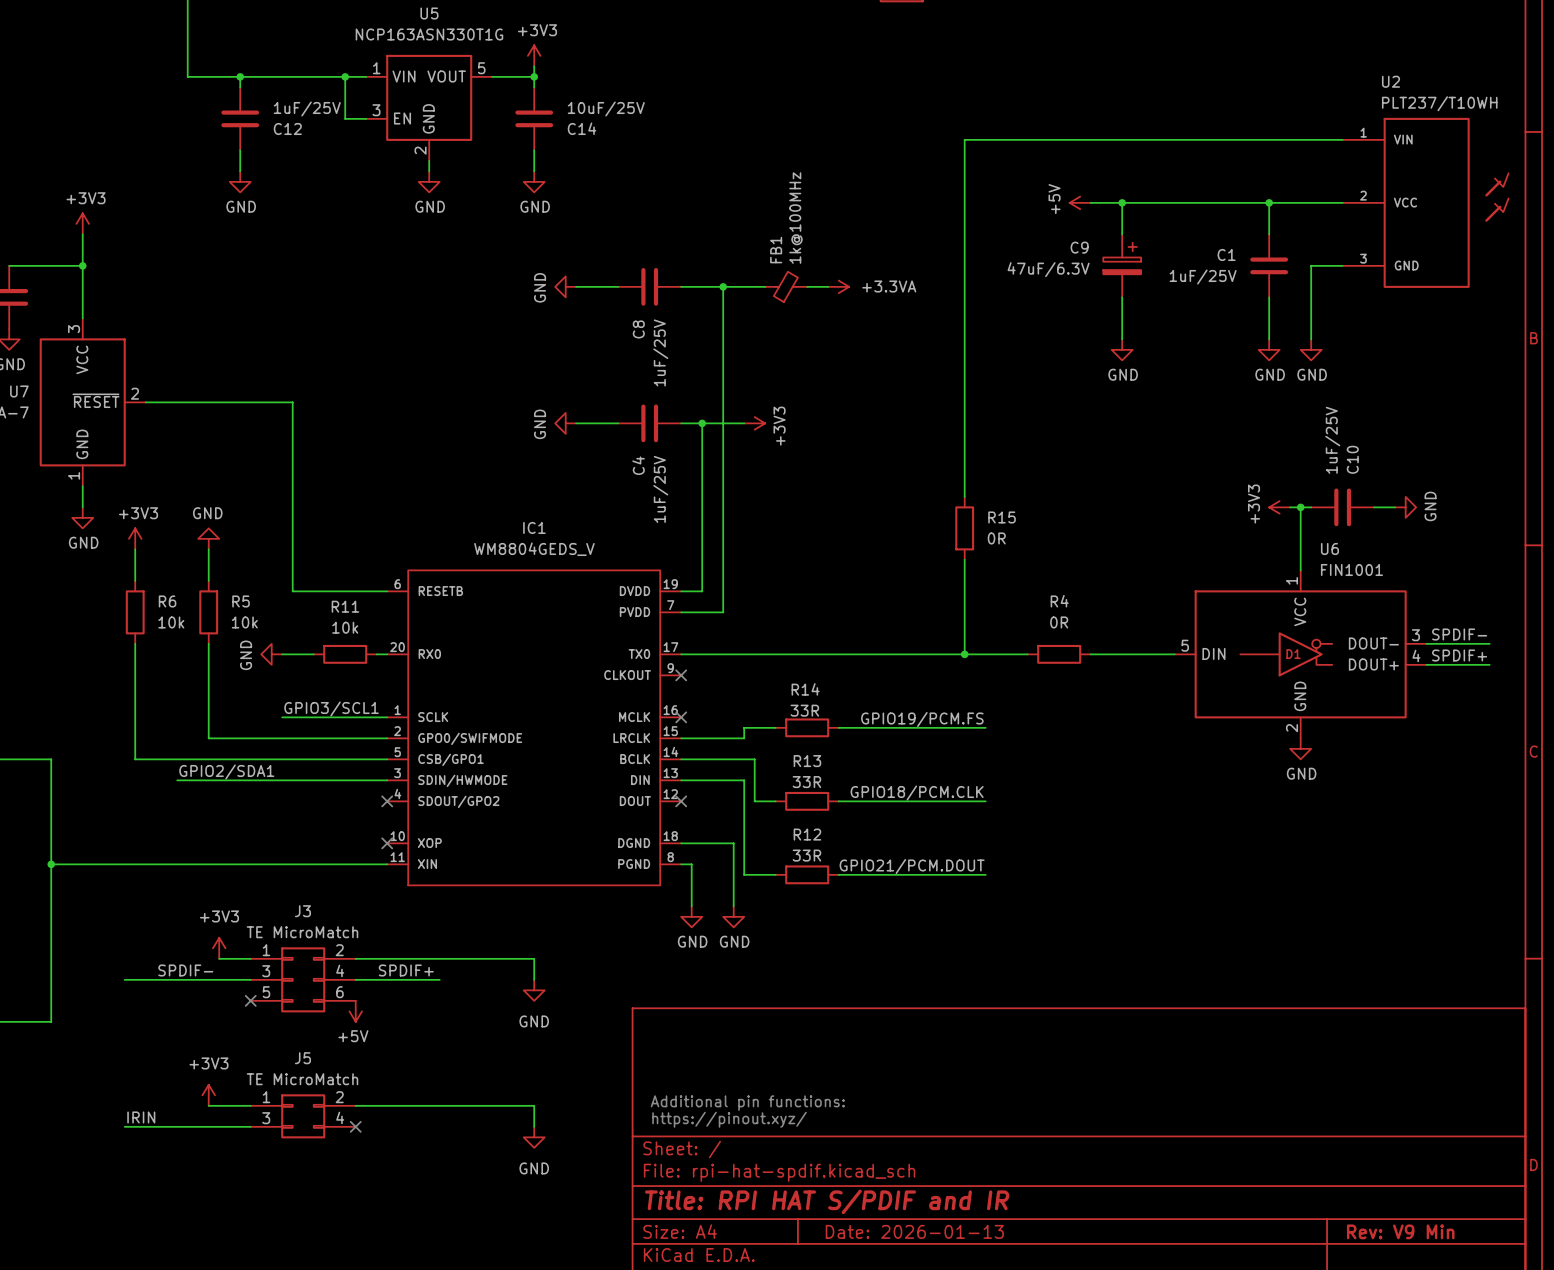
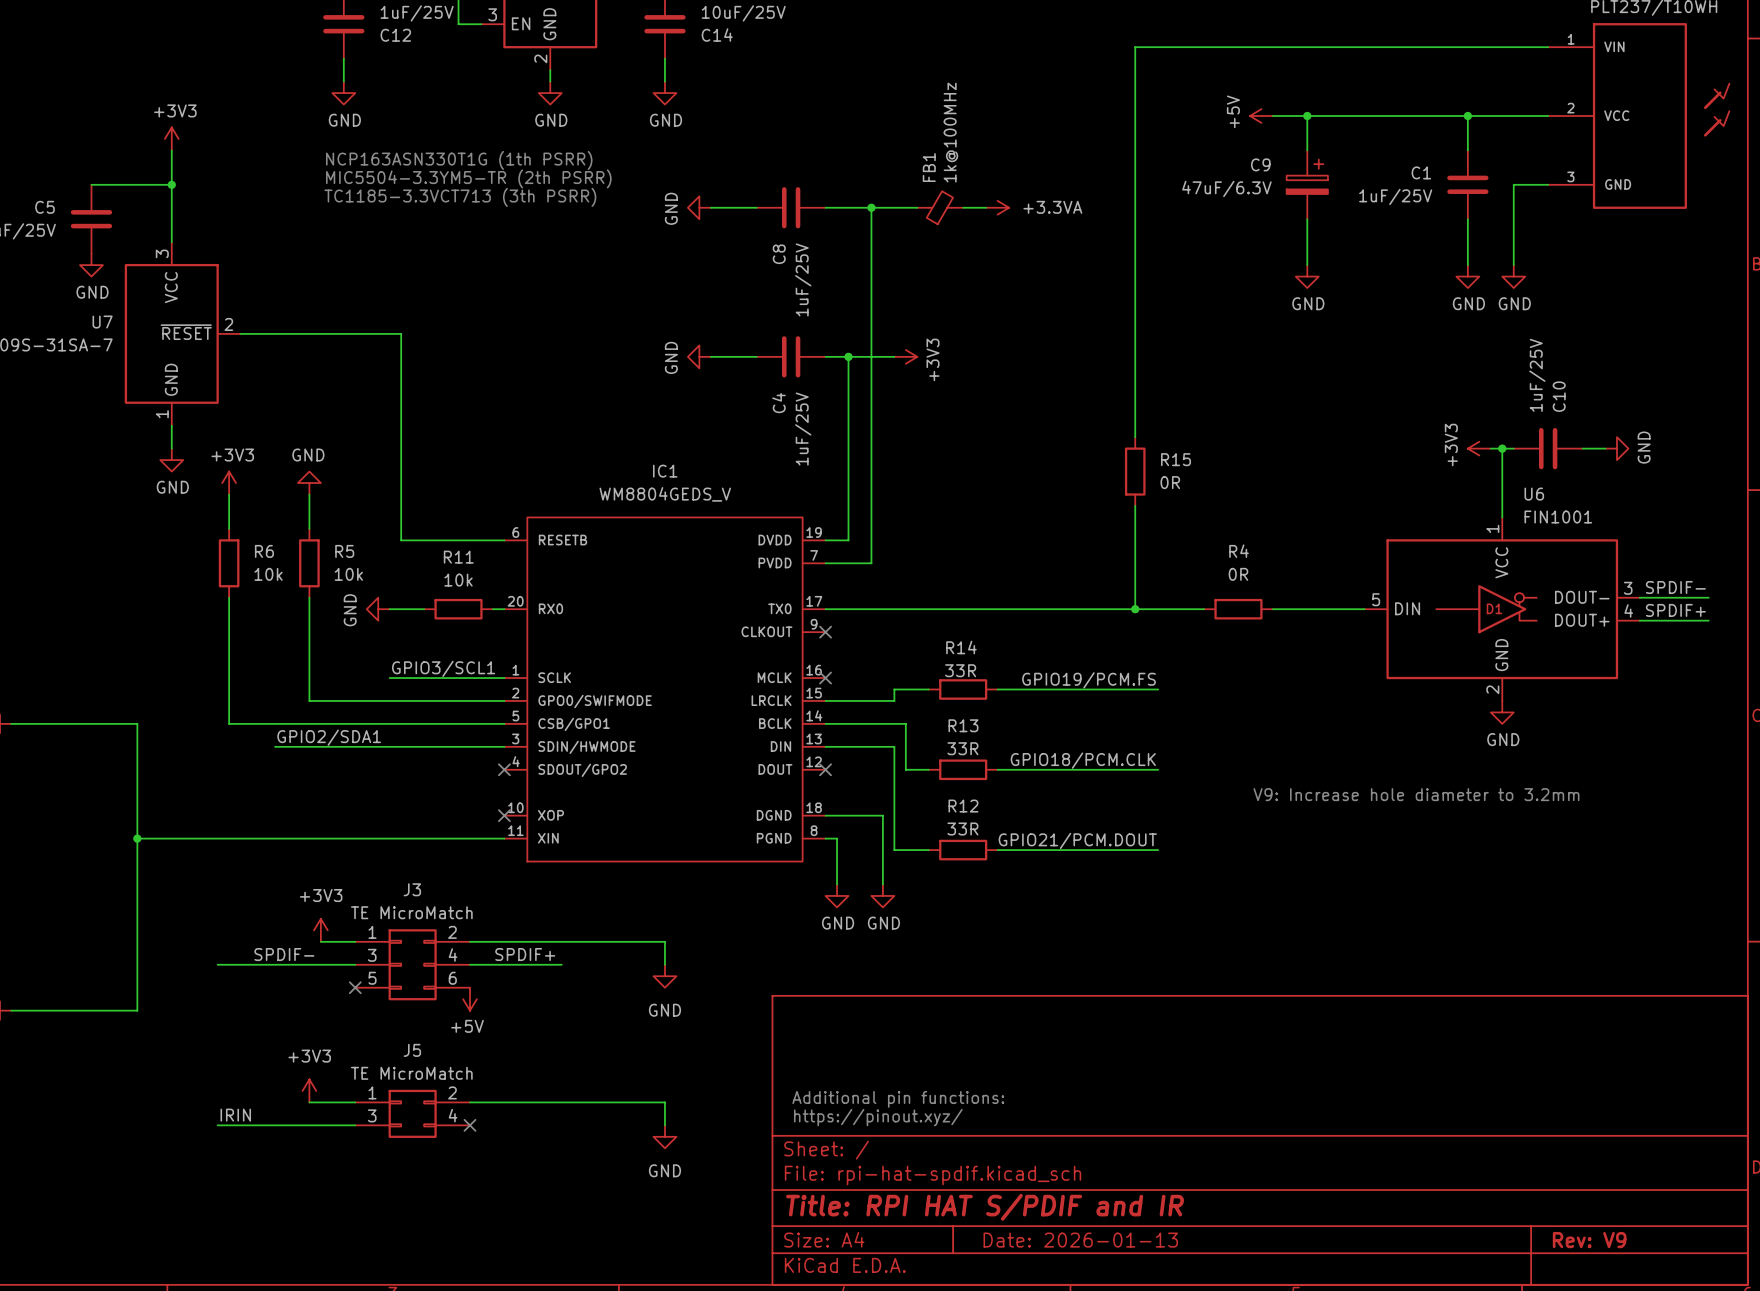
text: none -> NCP163ASN330T1G (1th PSRR) (459, 160)
text: none -> MIC5504-3.3YM5-TR (2th PSRR) (468, 178)
text: none -> TC1185-3.3VCT713 (3th PSRR) (460, 197)
text: none -> V9: Increase hole diameter to 3.2mm (1416, 794)
title block: Rev: V9 Min (1400, 1231) -> Rev: V9 (1589, 1240)

